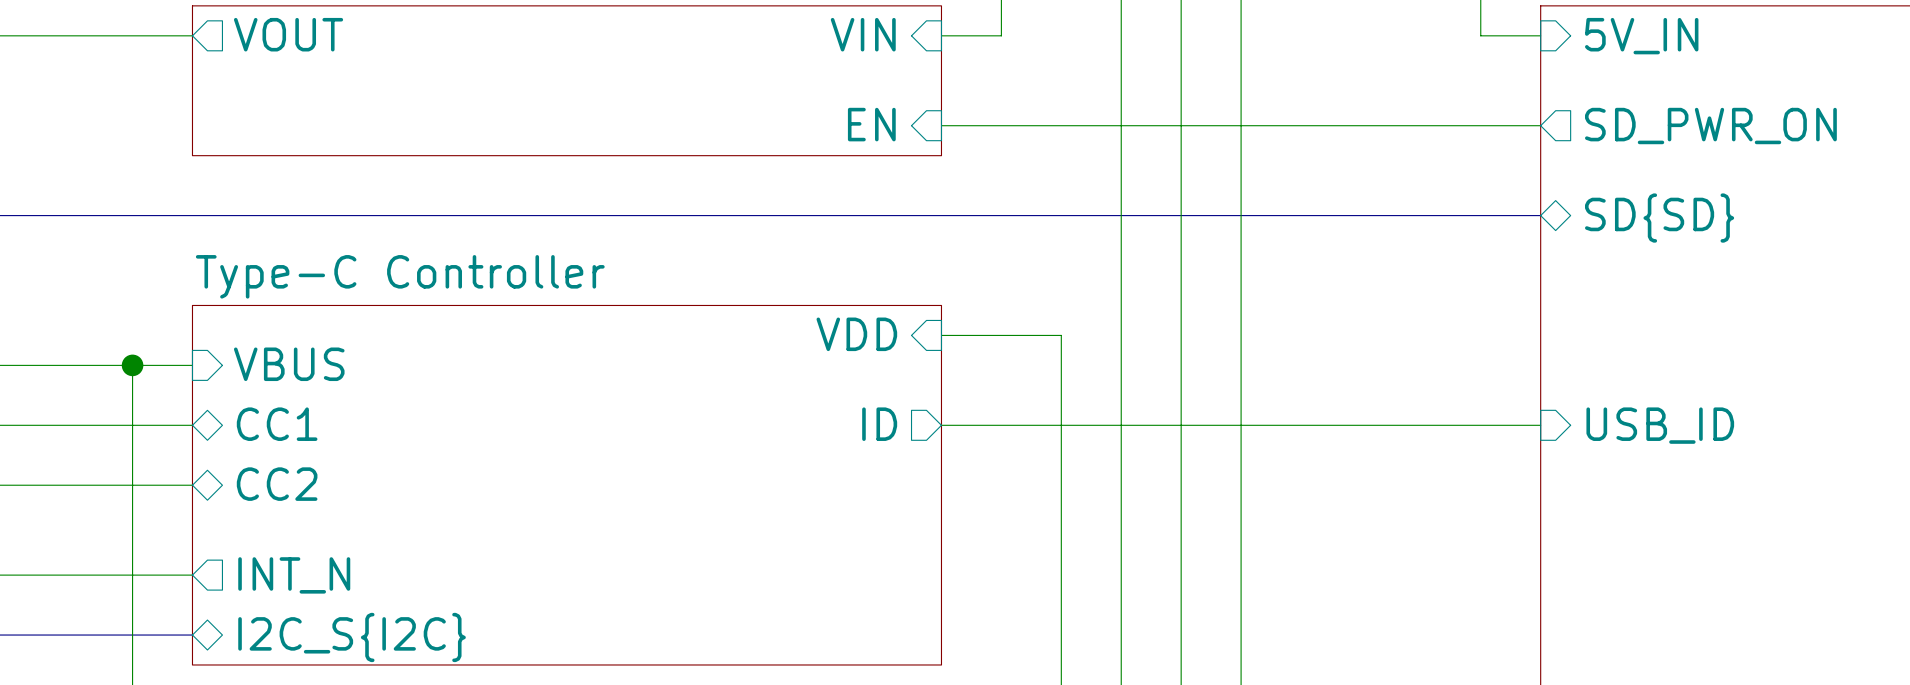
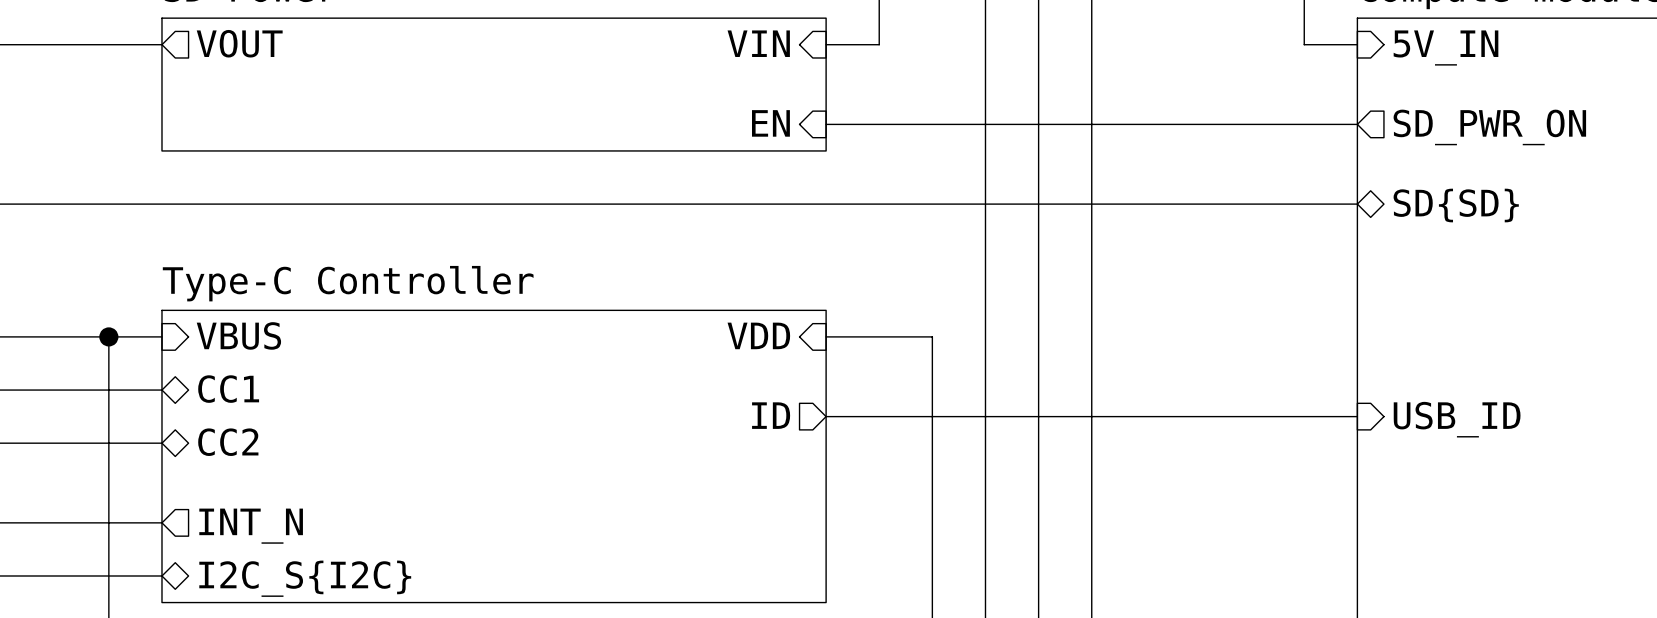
sheet Type-C Controller shape: [192, 305, 942, 665] -> [161, 310, 827, 603]
sheet pin position: VDD (856, 334) -> VDD (758, 335)
wire: (941, 335) (1061, 335) (1061, 365) -> (826, 336) (932, 336)
sheet pin position: ID (879, 424) -> ID (771, 415)
wire: (941, 425) (1540, 425) -> (826, 416) (1357, 416)
sheet pin position: USB_ID (1660, 425) -> USB_ID (1457, 419)

